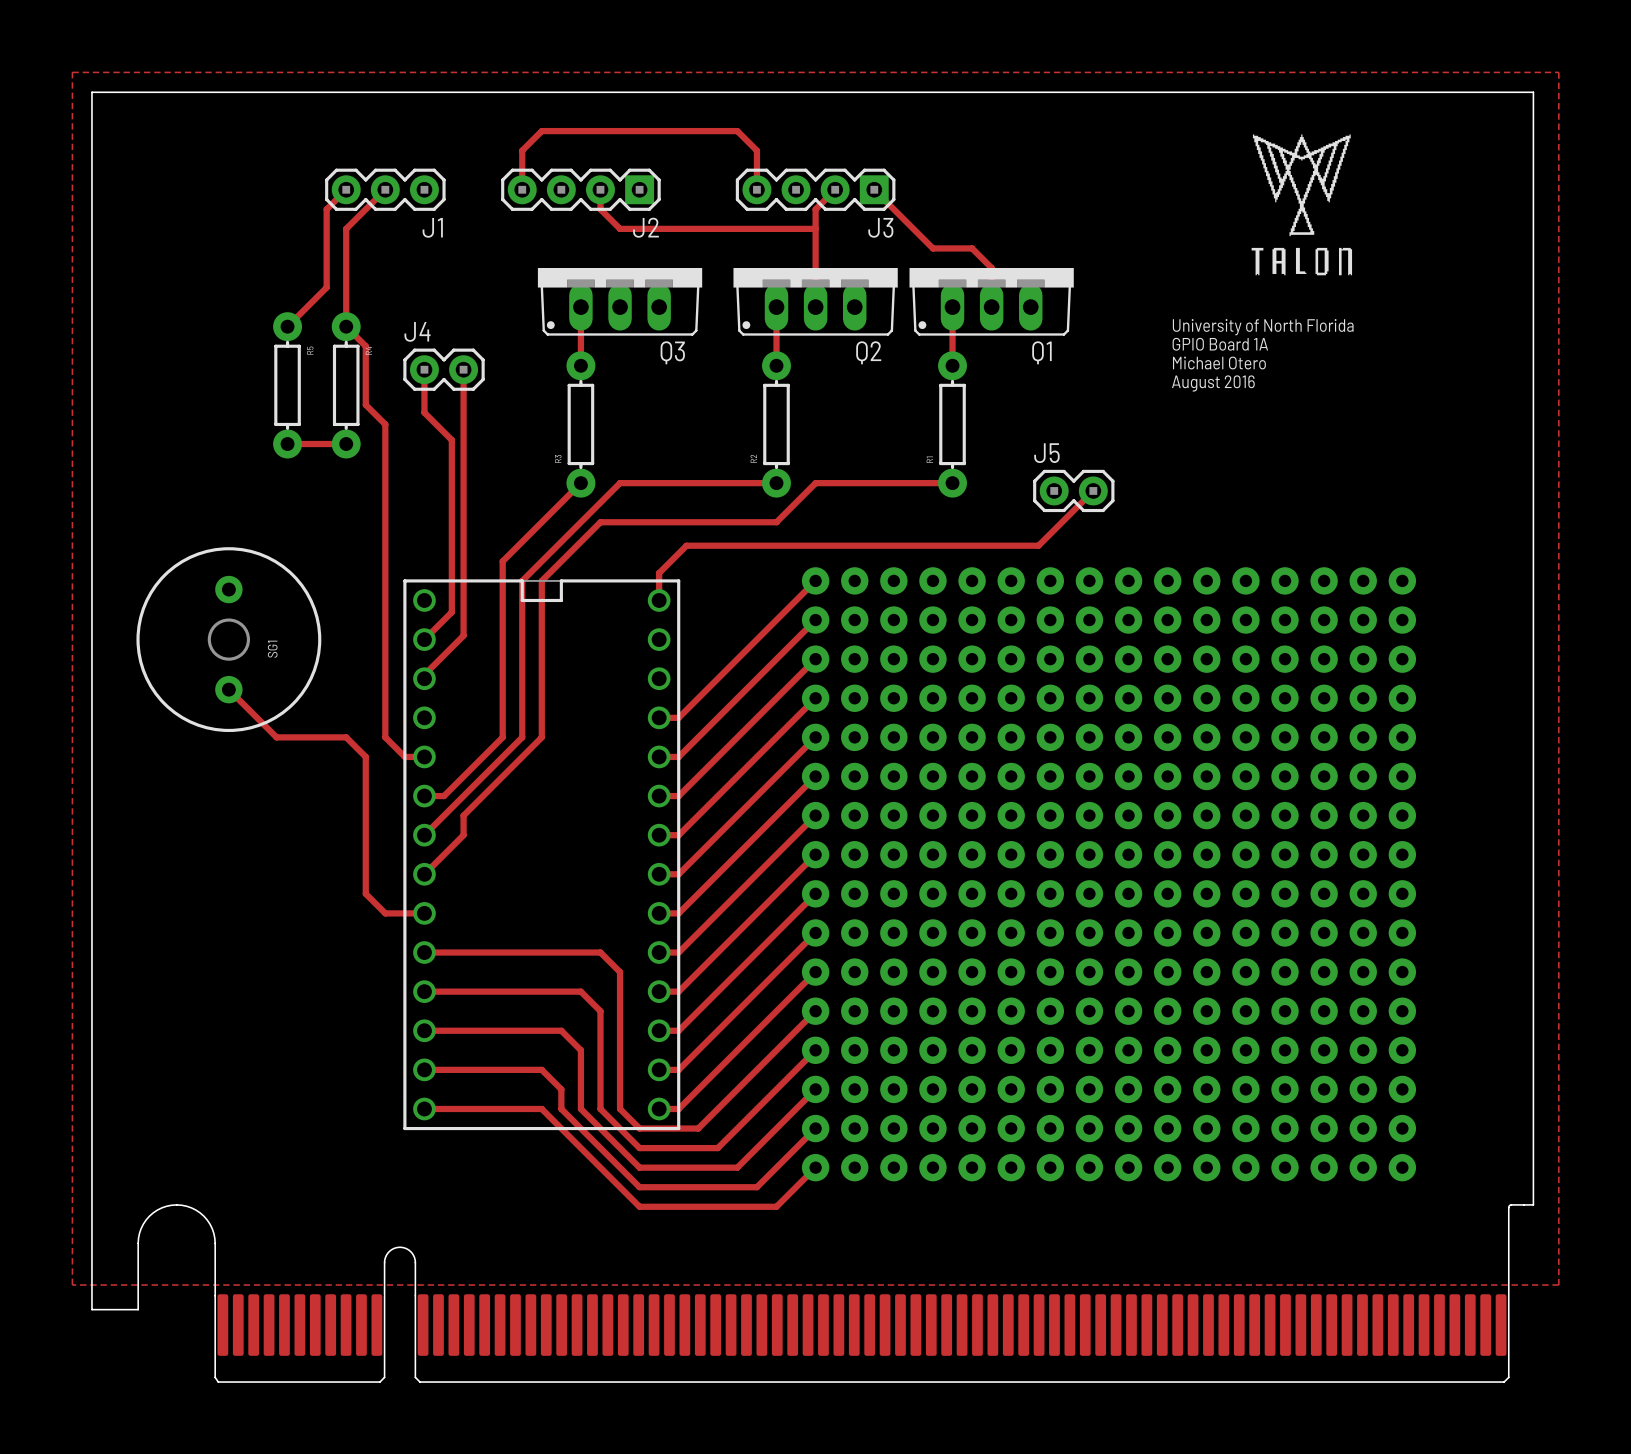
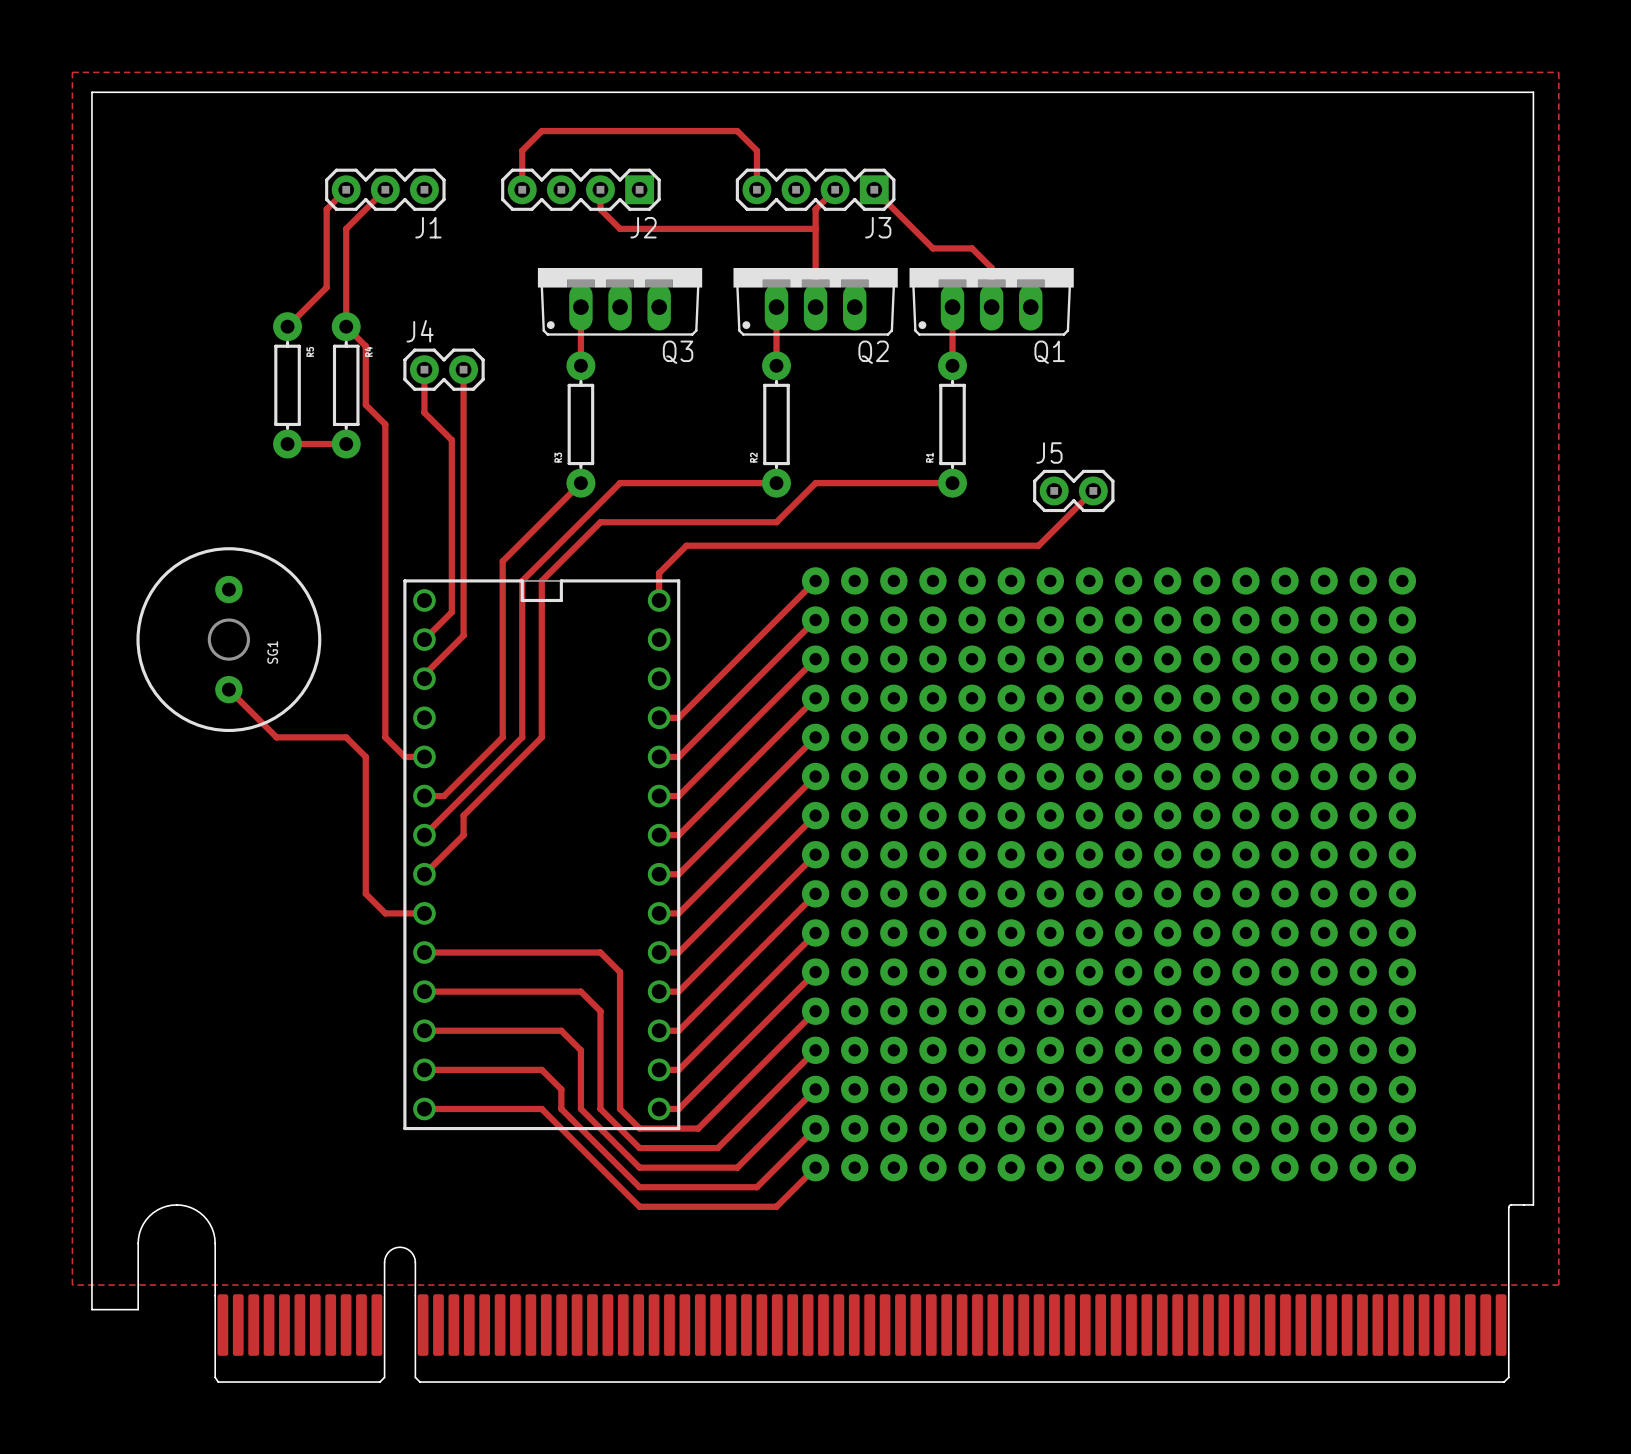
drawing: [1251, 134, 1353, 276] -> none
text: University of North Florida (1263, 327) -> none
text: GPIO Board 1A (1220, 344) -> none
text: Michael Otero (1219, 363) -> none
text: August 2016 (1213, 383) -> none

